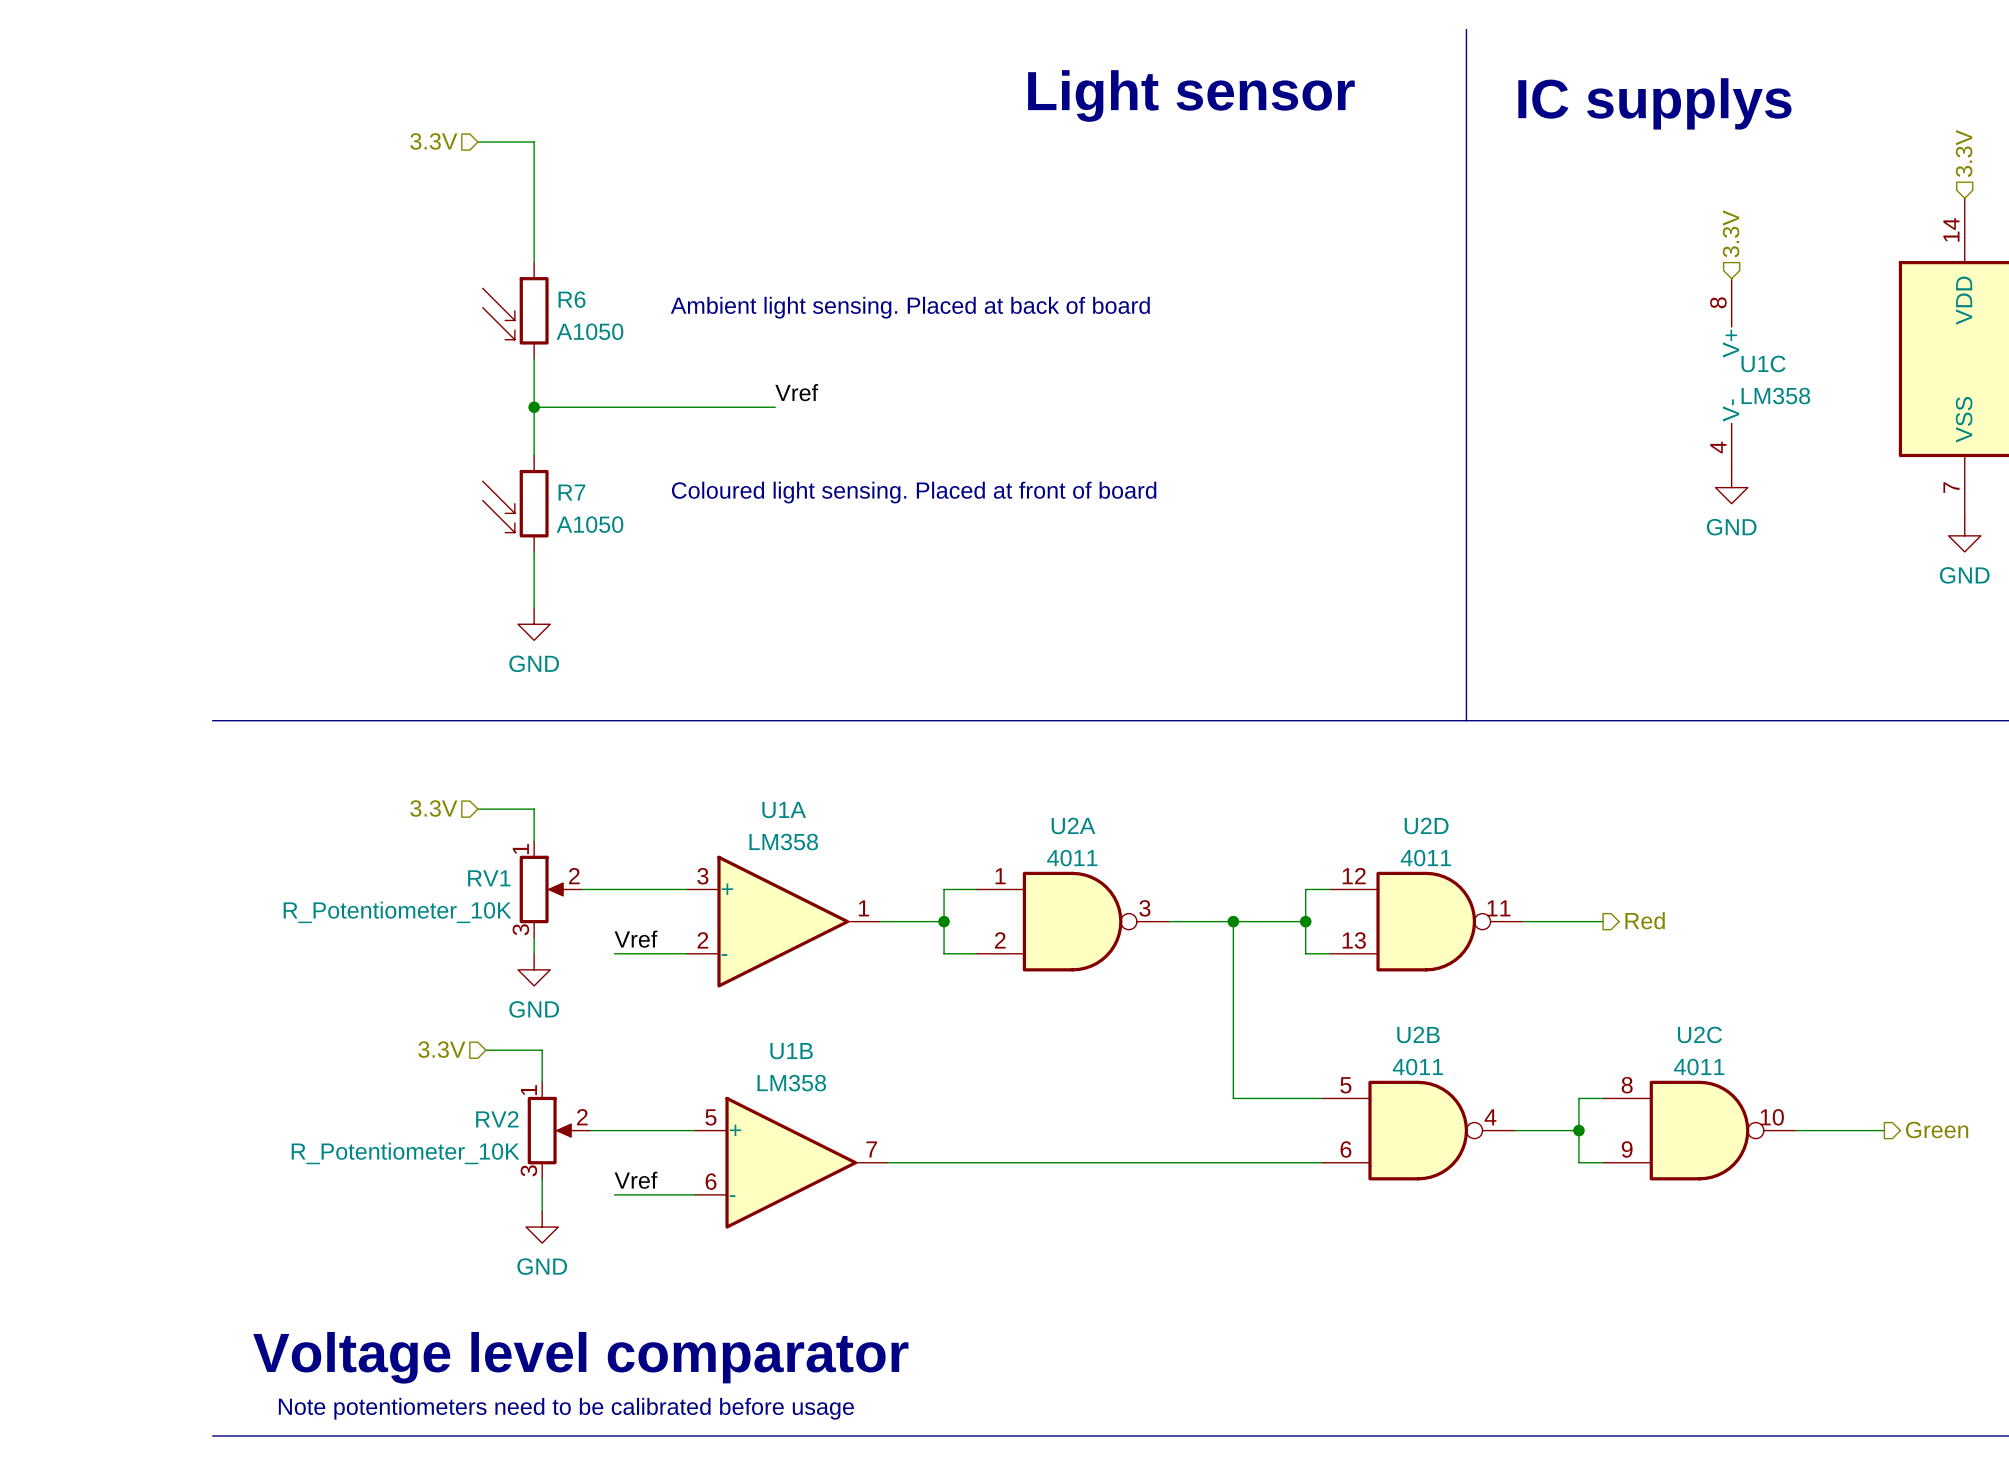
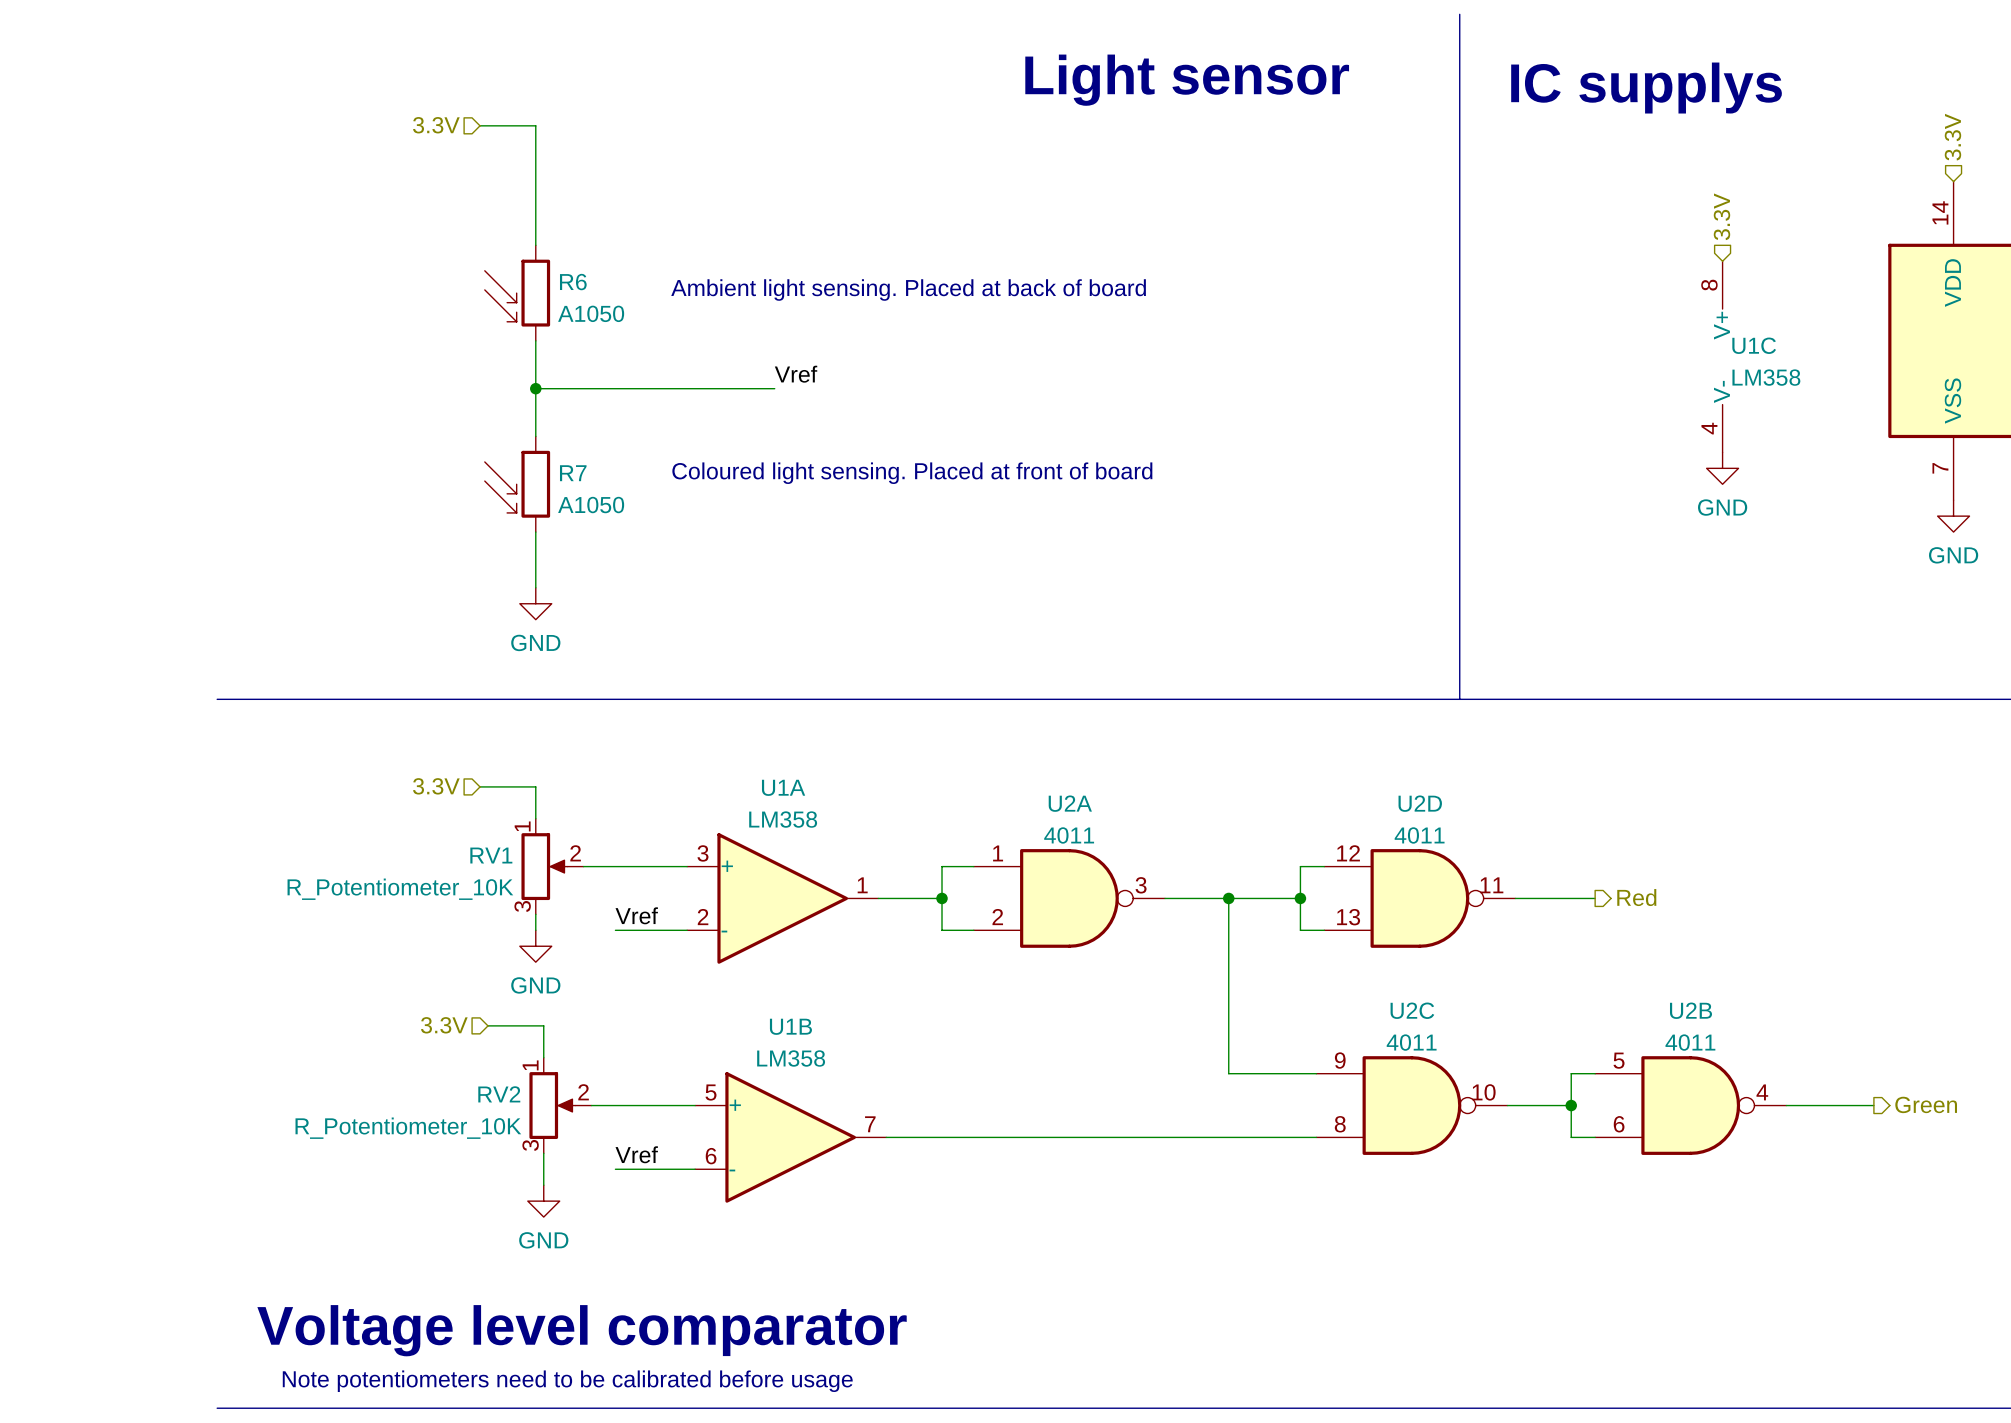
U2B position: (1418, 1130) -> (1690, 1105)
U2C flip: as is (1699, 1130) -> up-down (1411, 1105)
U2C position: (1699, 1130) -> (1411, 1105)

